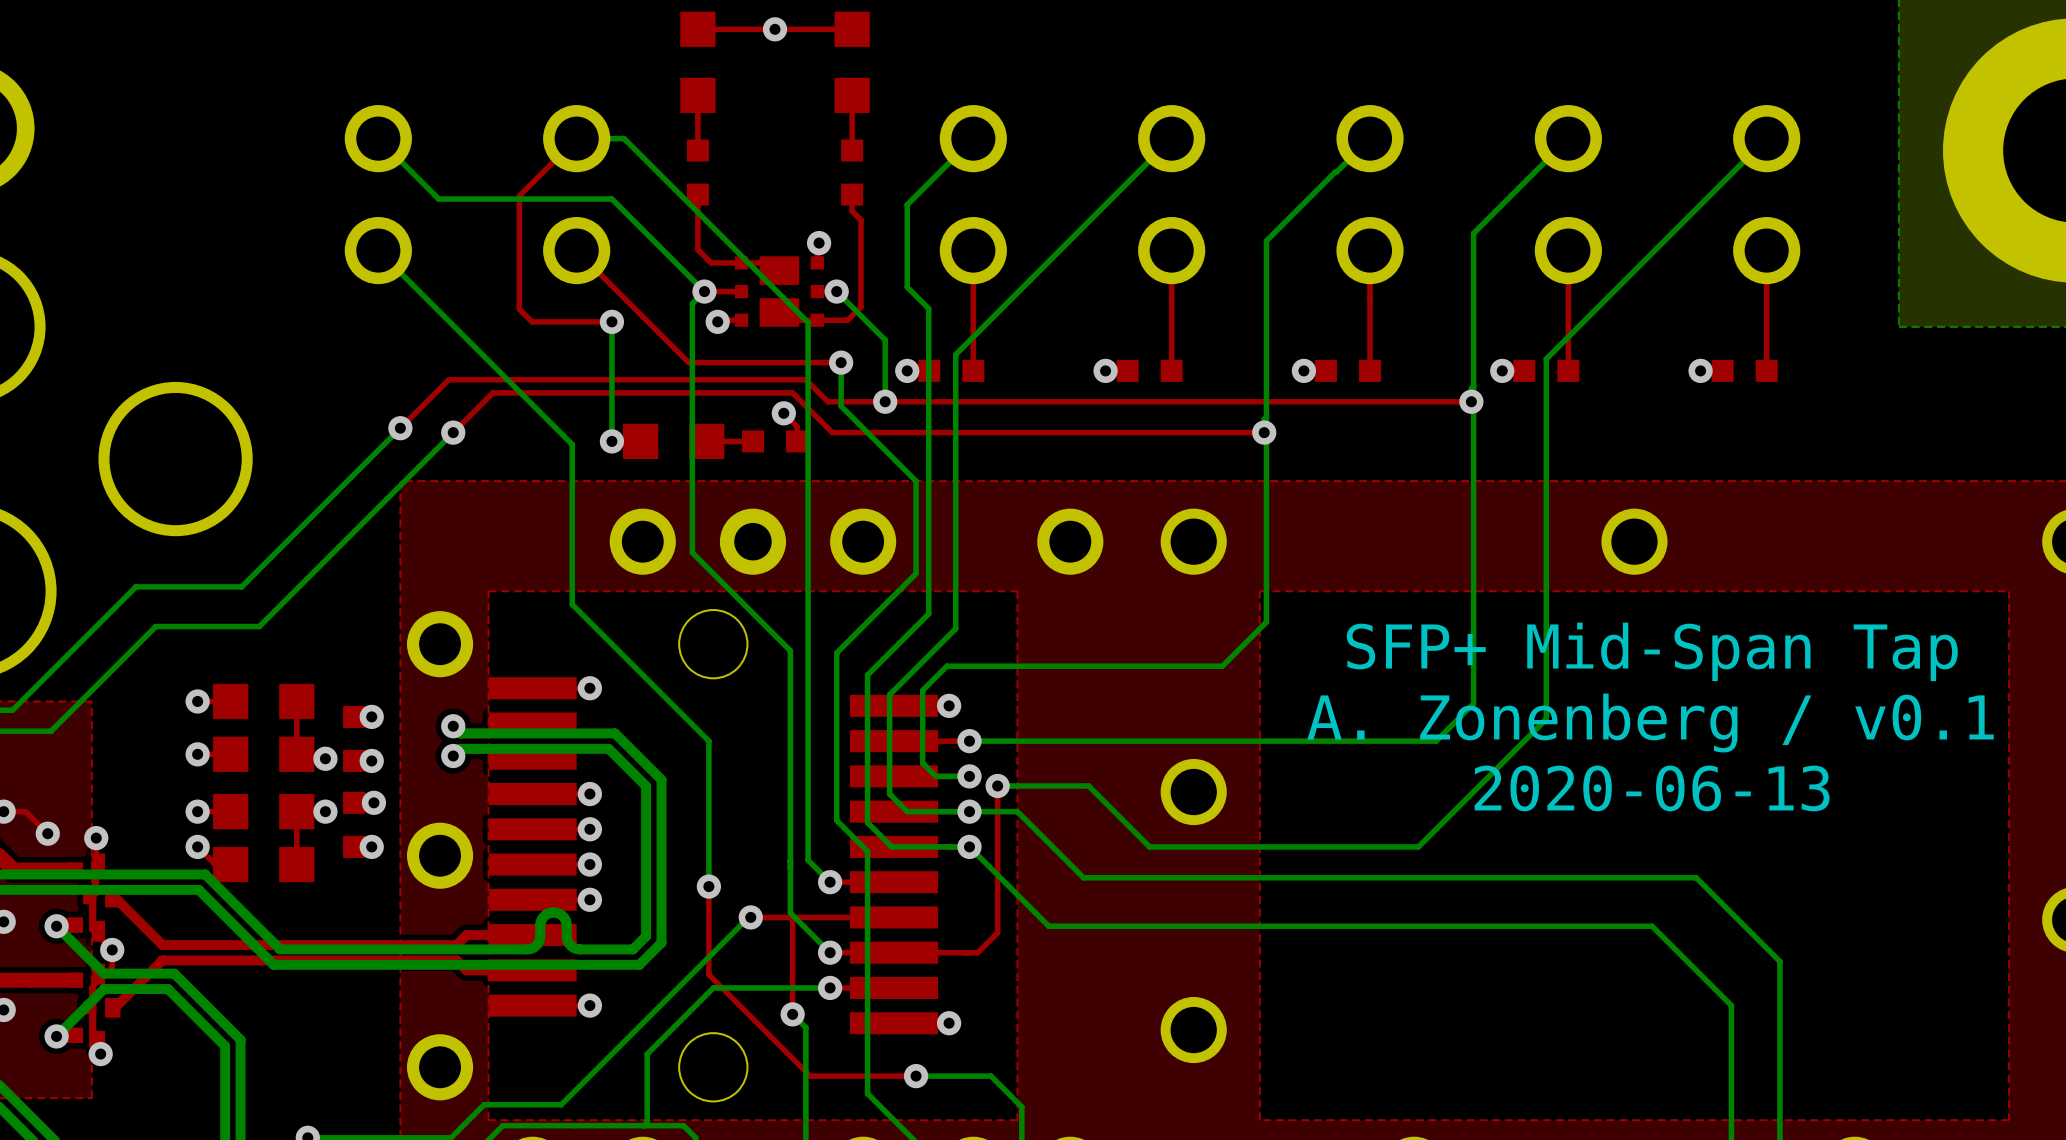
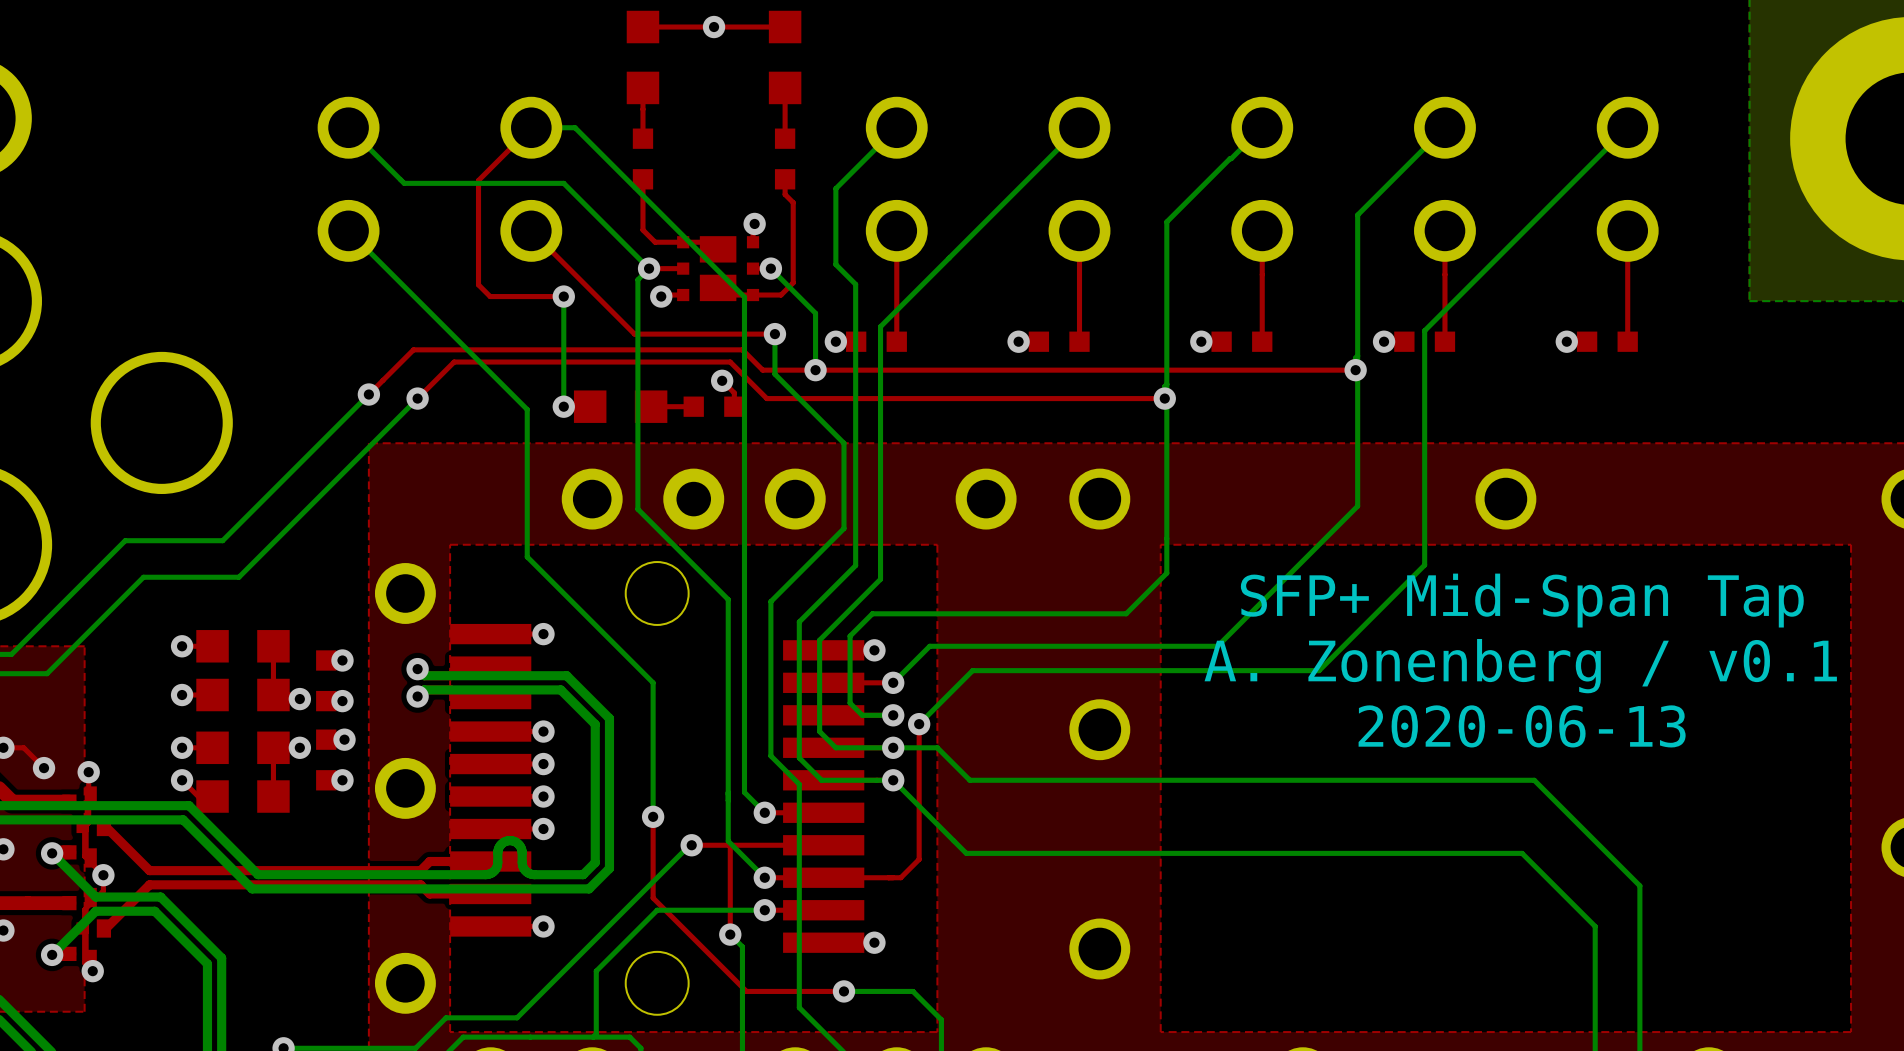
bottom track: (1473, 549) (1473, 703) (1436, 741) (969, 741) -> (1357, 506) (1217, 646) (929, 646) (893, 682)
bottom track: (1546, 613) (1546, 719) (1418, 846) -> (1562, 808) (1534, 780) (1306, 780)
bottom track: none -> (1424, 565) (1319, 670) (972, 670) (919, 724)
bottom track: (997, 785) (1088, 785) (1149, 846) -> (969, 780) (1059, 780)
bottom track: (1052, 846) (1083, 877) (1696, 877) -> none

